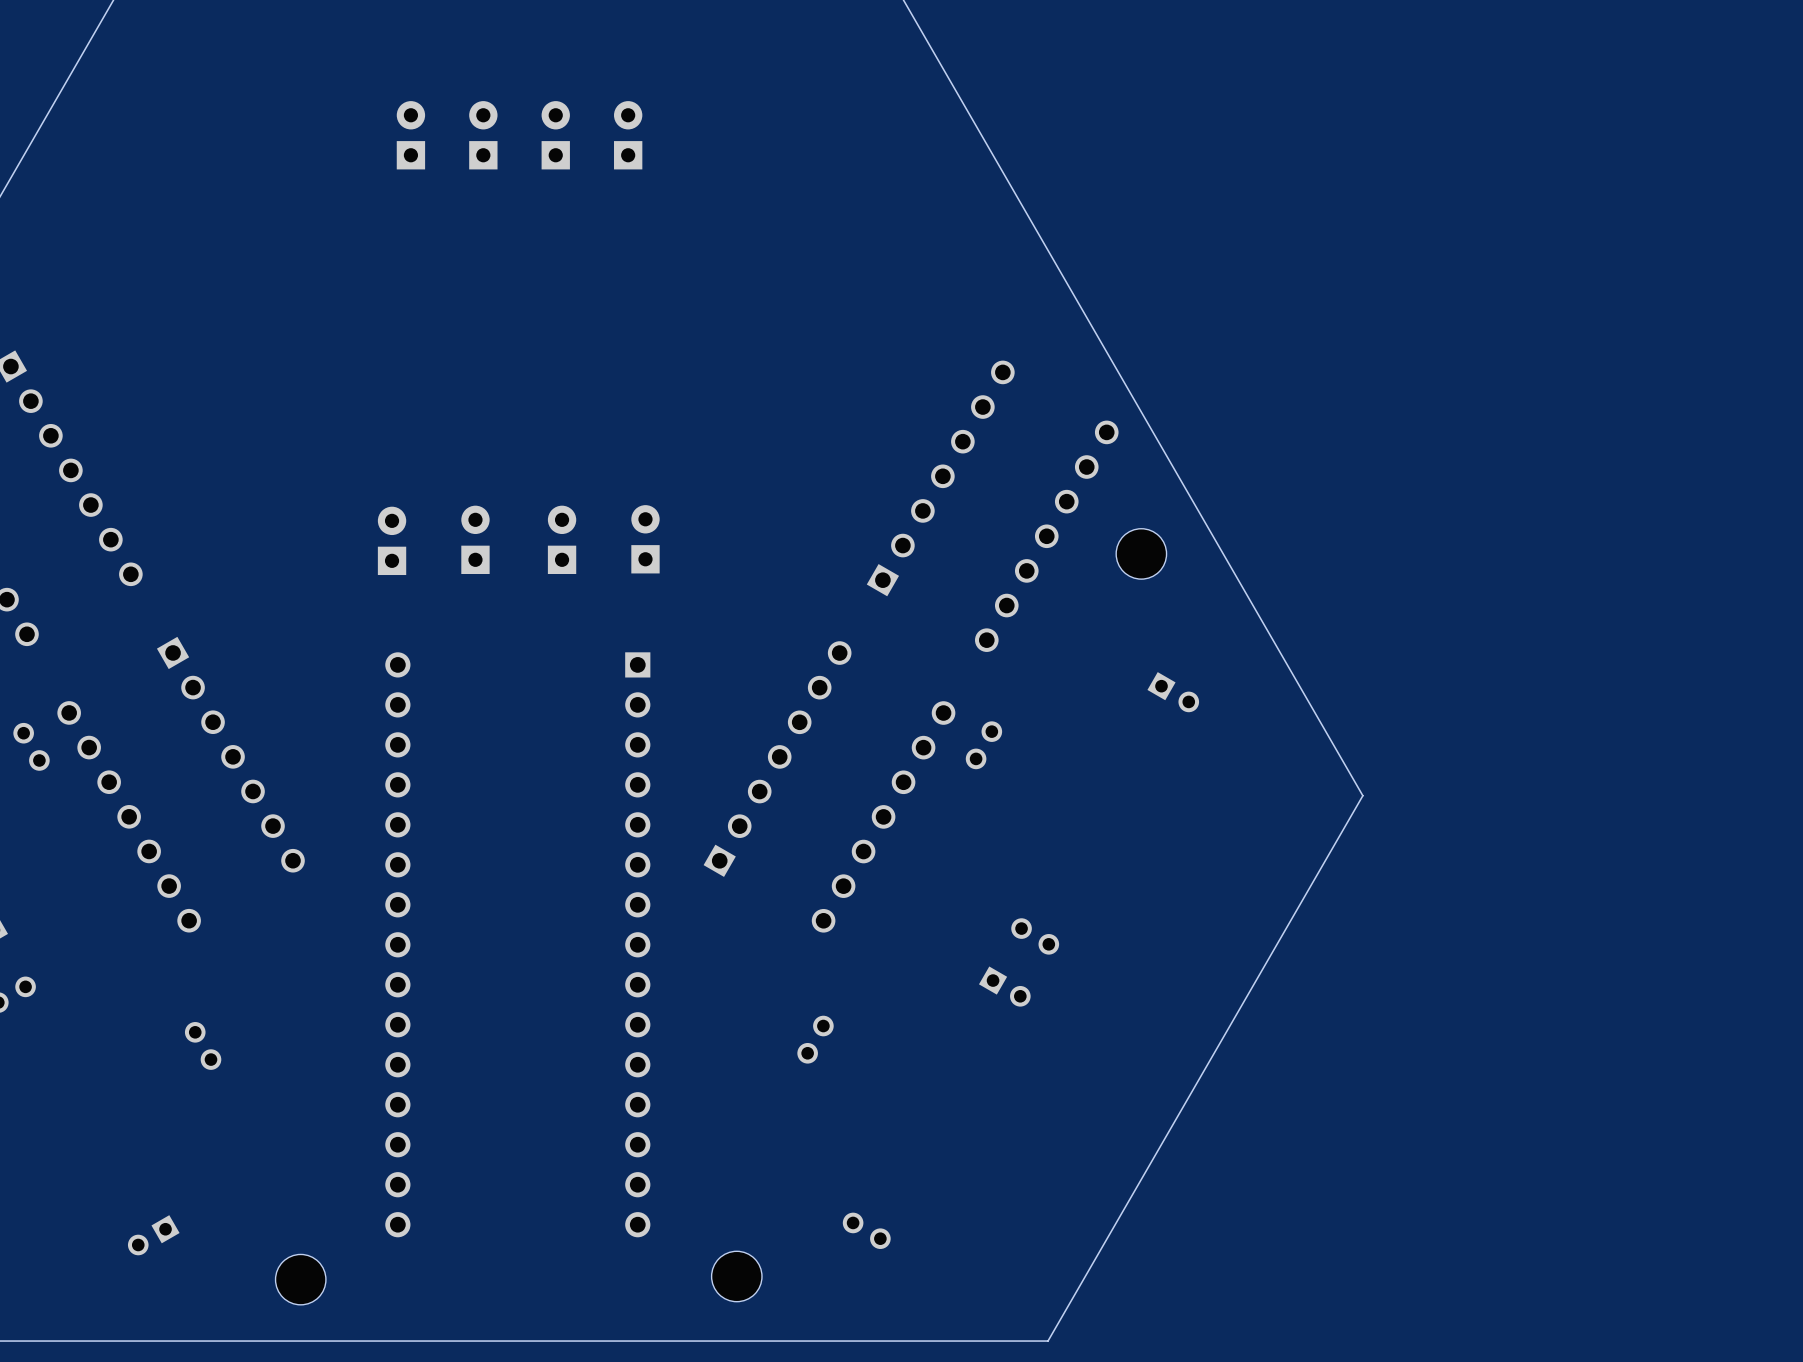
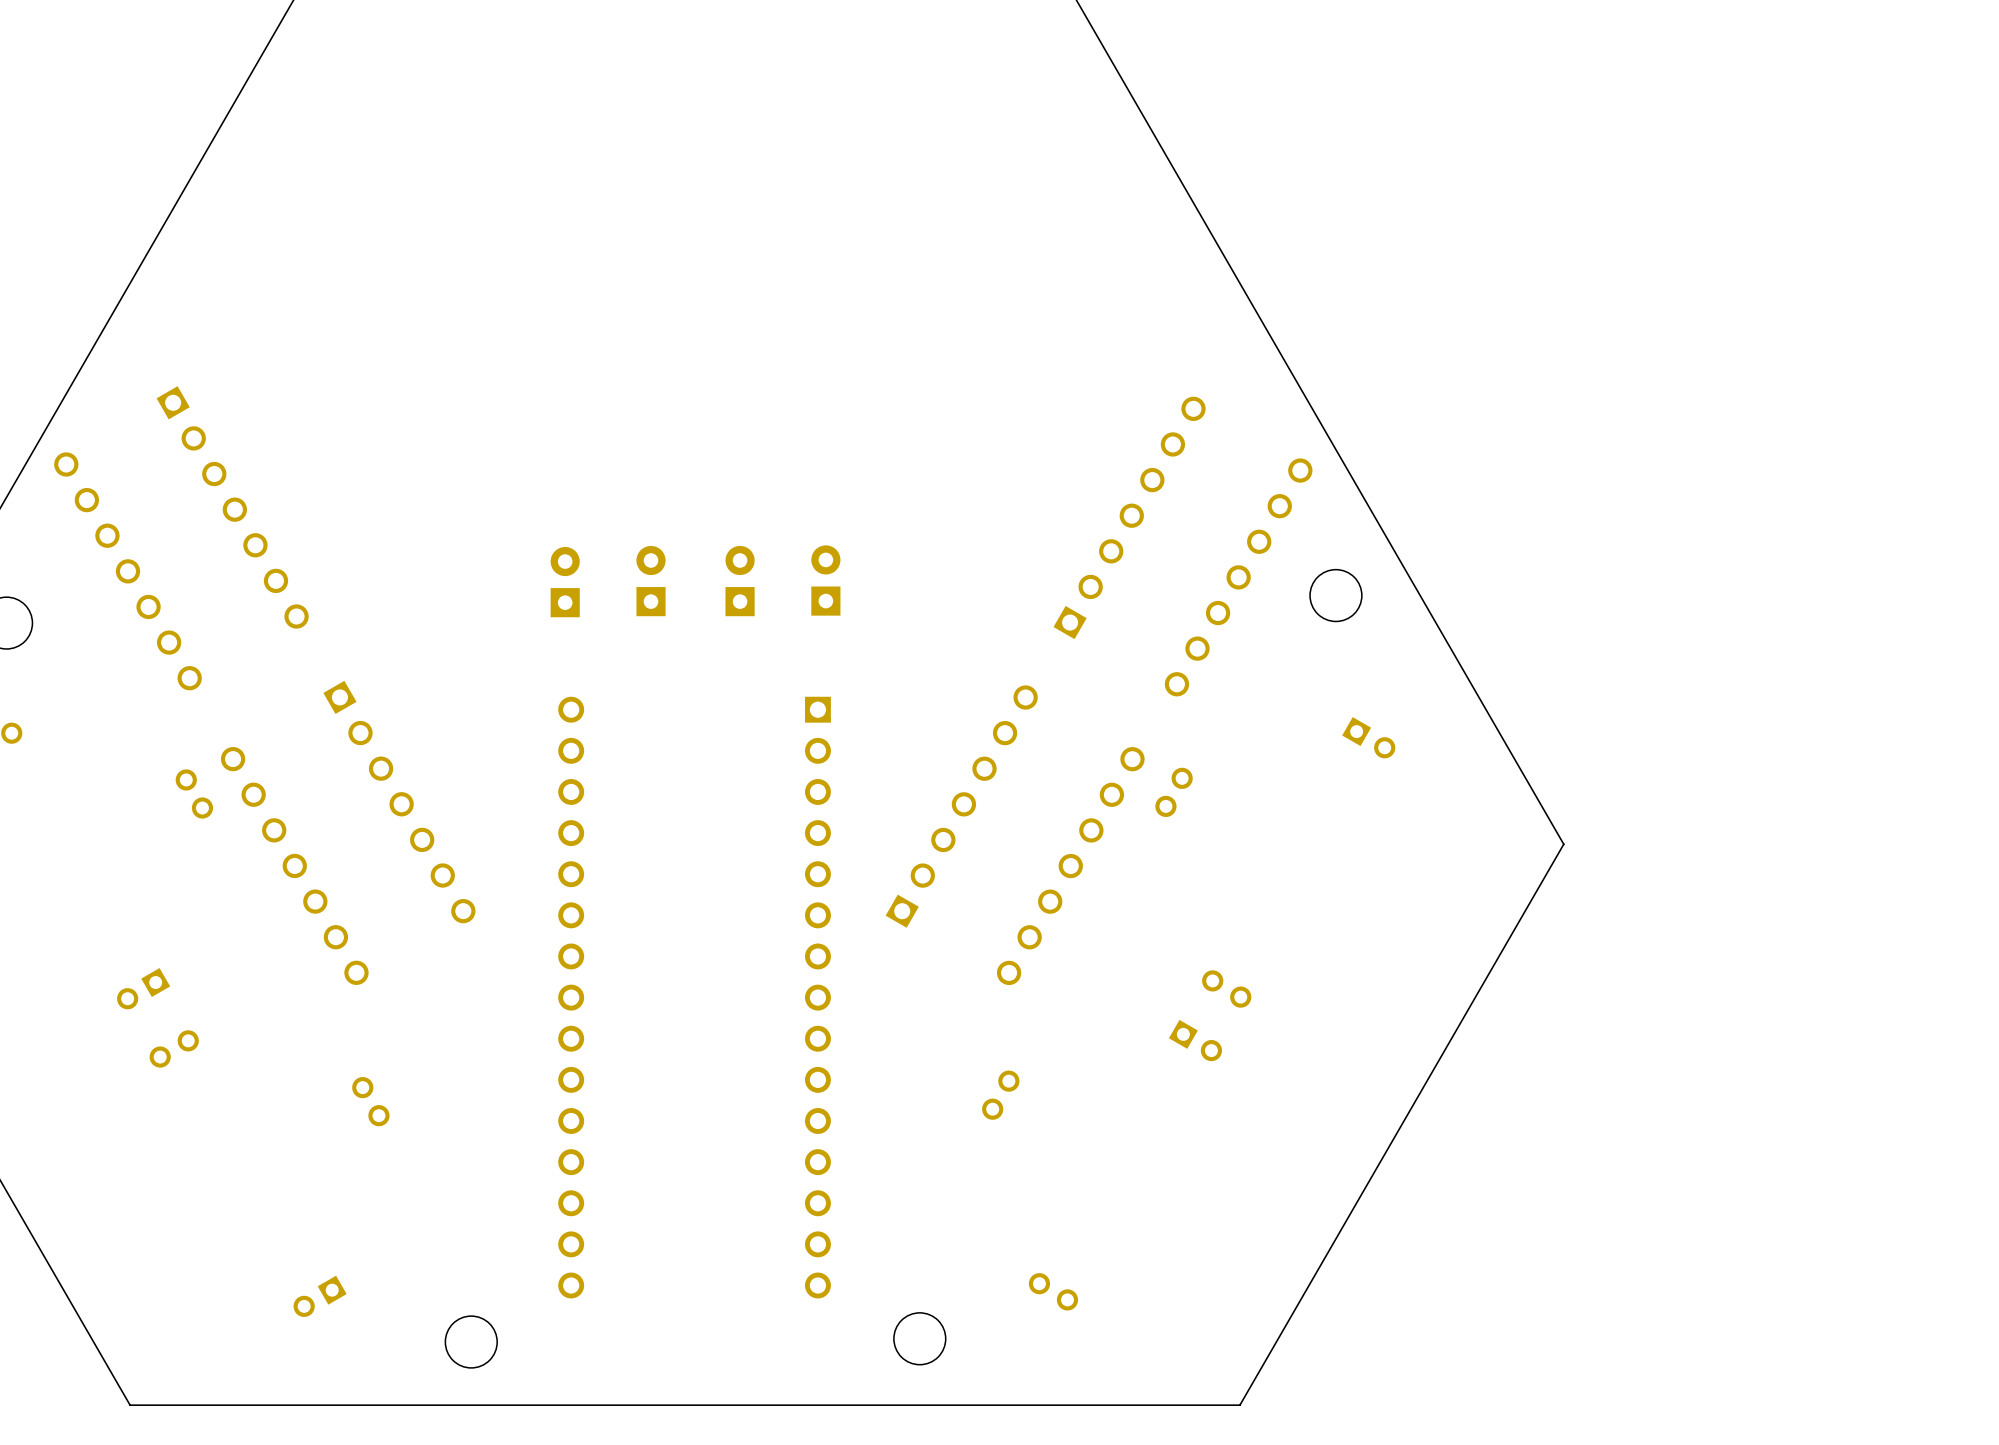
part: (410, 135) -> none
part: (483, 135) -> none
part: (555, 135) -> none
part: (628, 135) -> none

